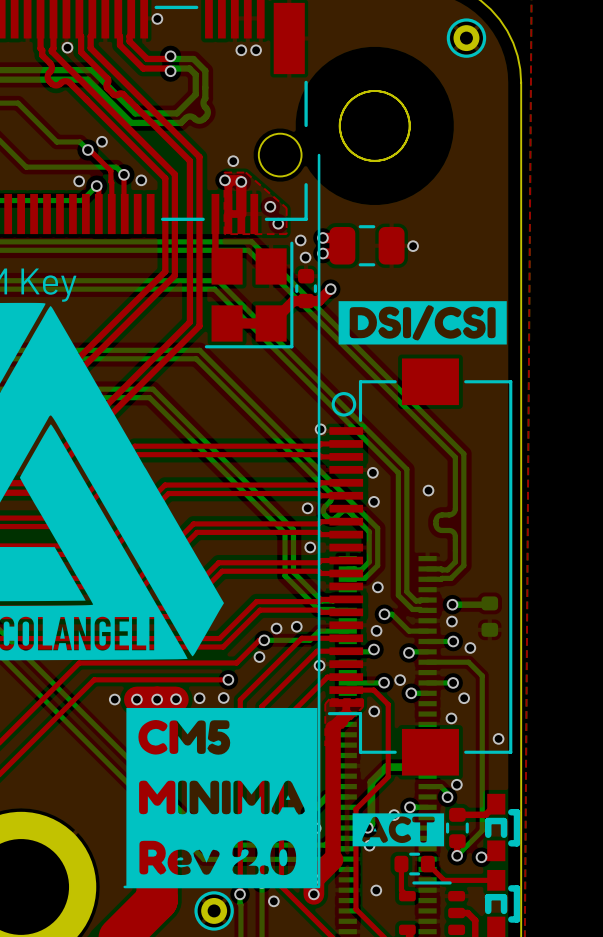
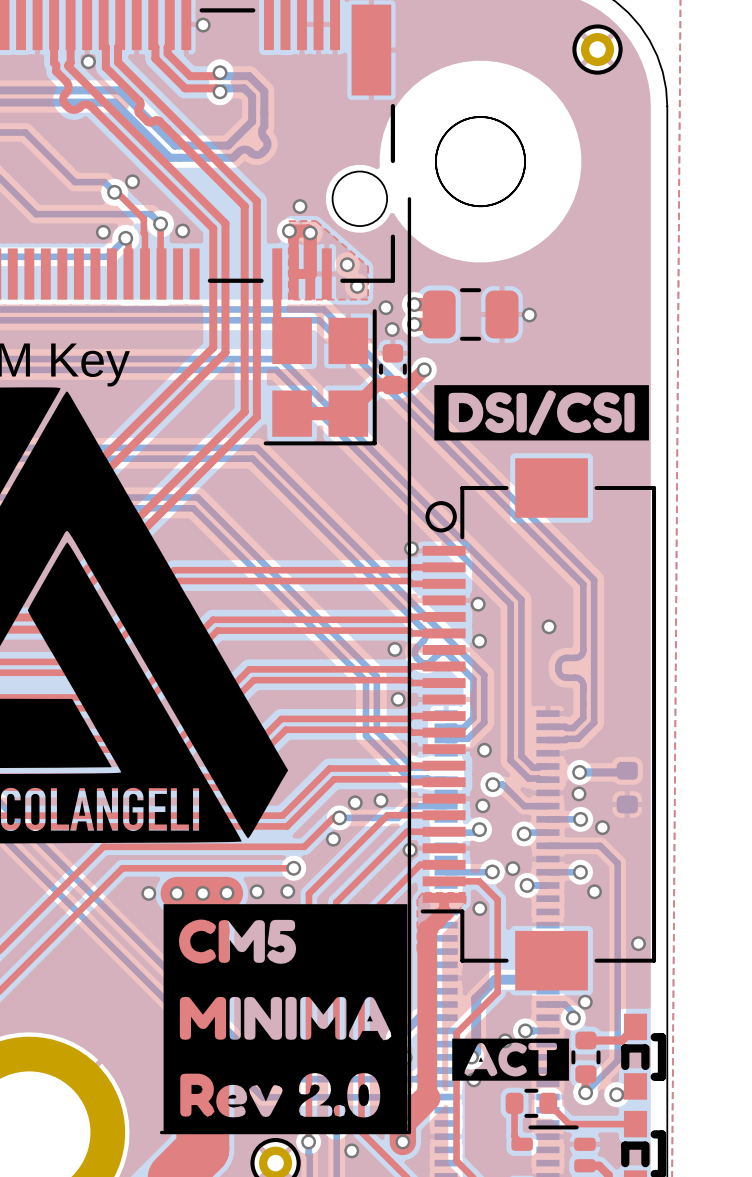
via: (241, 50) -> none
via: (256, 50) -> none
via: (451, 718) -> none
via: (376, 890) -> none

